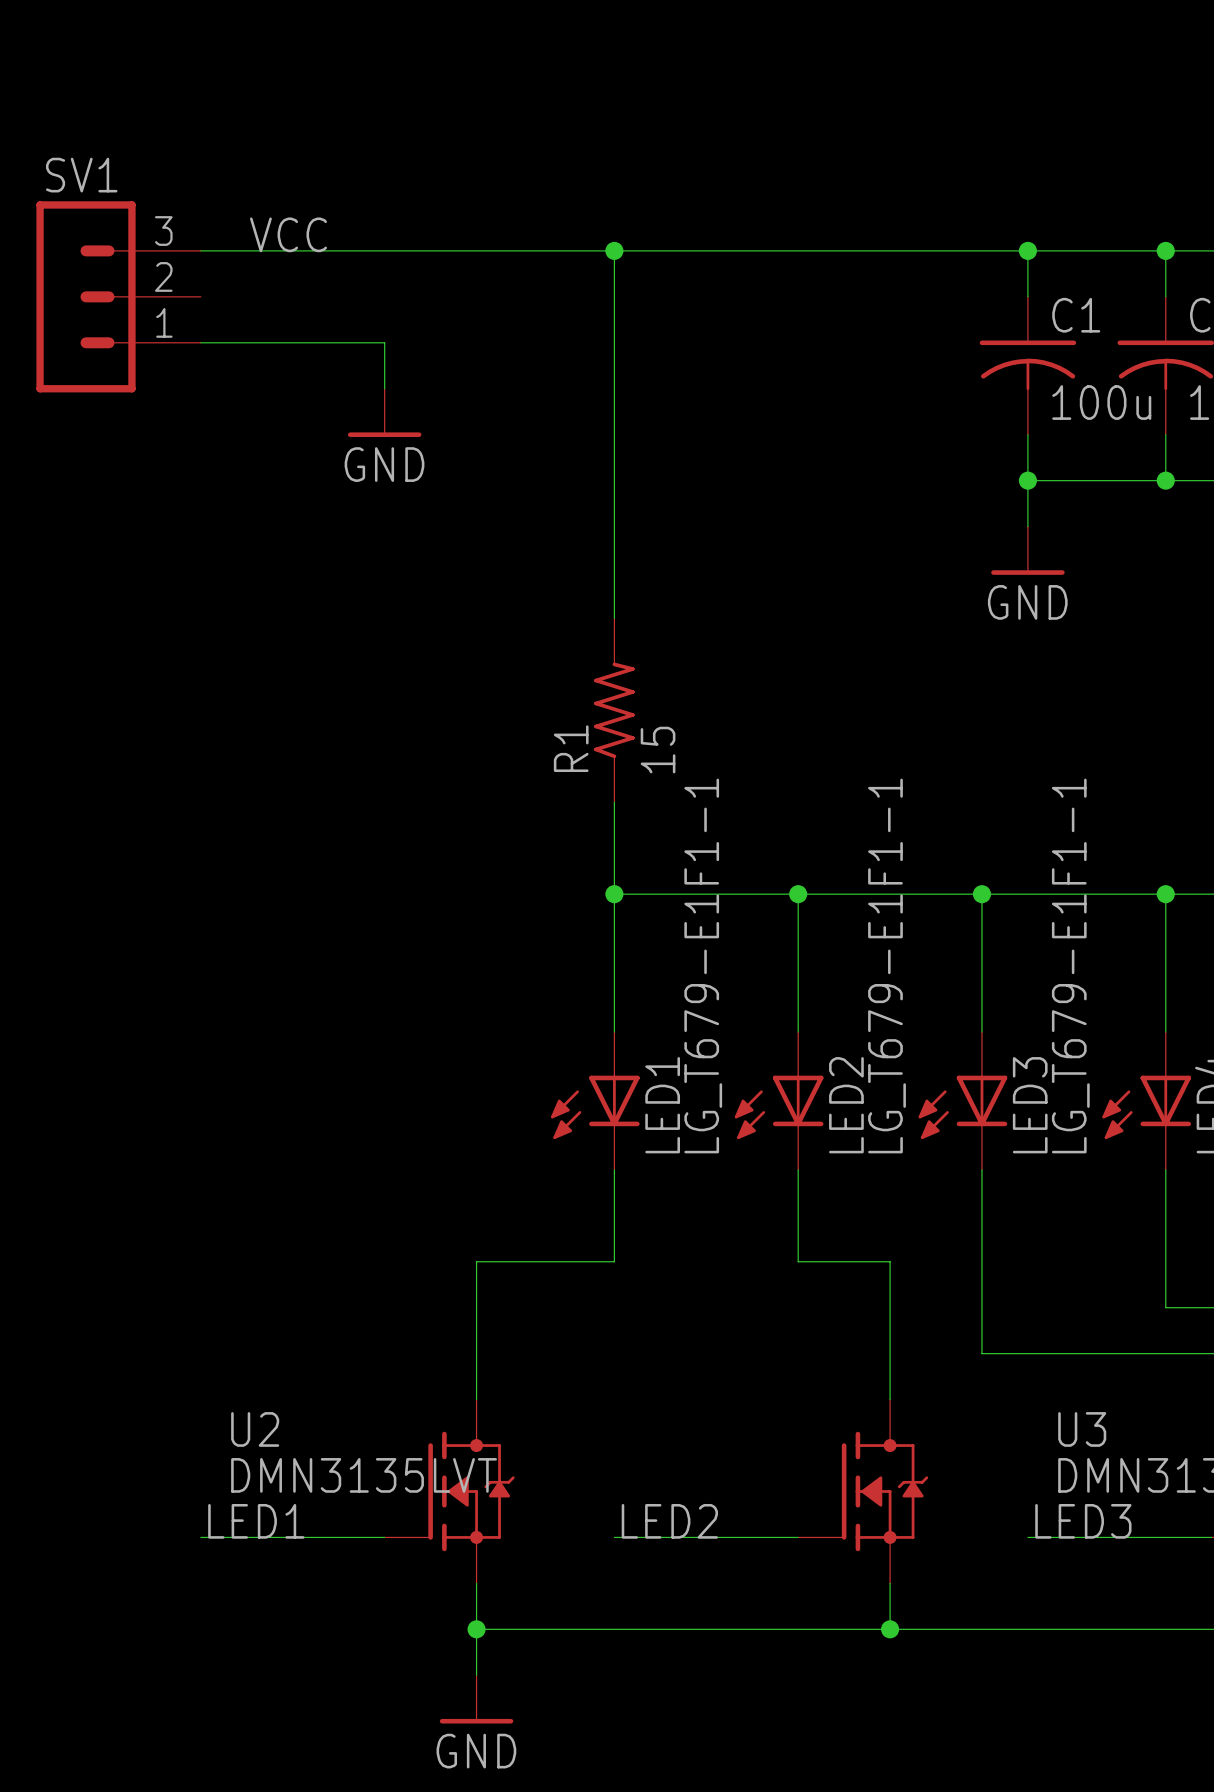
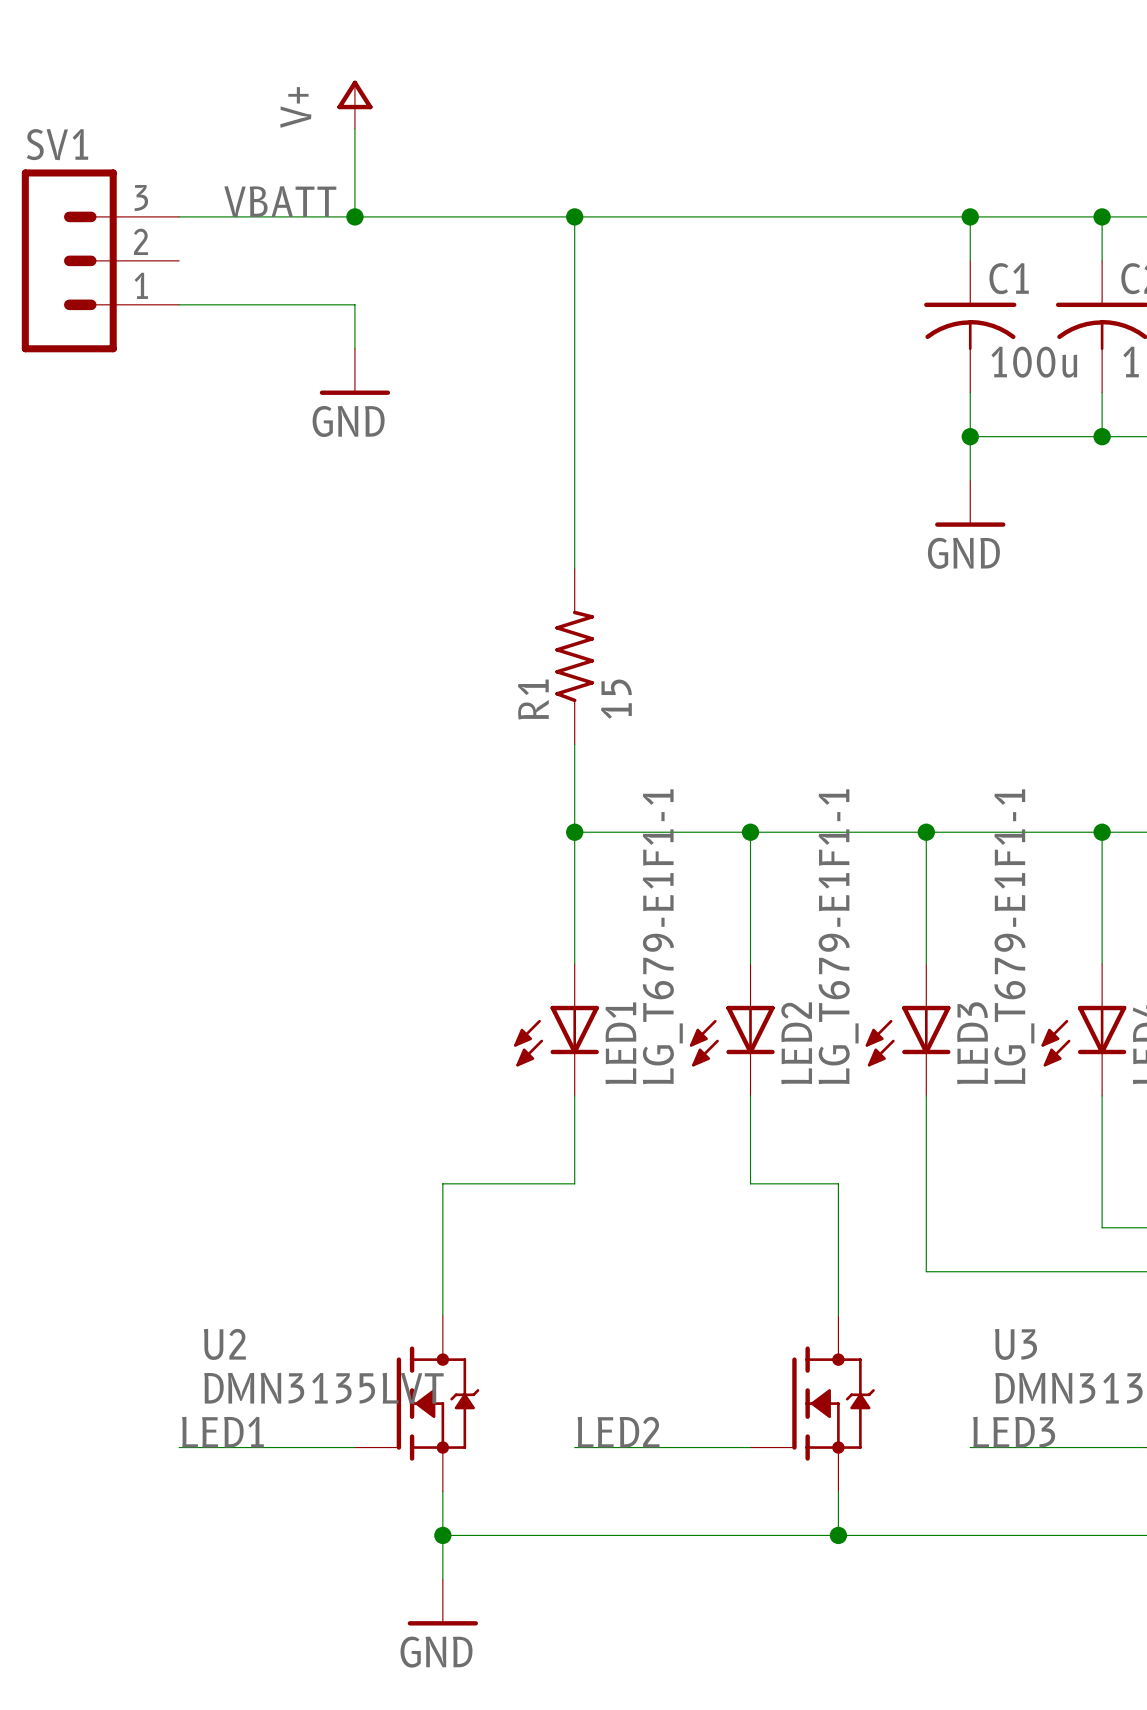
power symbol: none -> V+ (354, 104)
wire: none -> (354, 129) (354, 216)
label: VCC (288, 234) -> VBATT (280, 201)
junction: none -> (354, 216)

